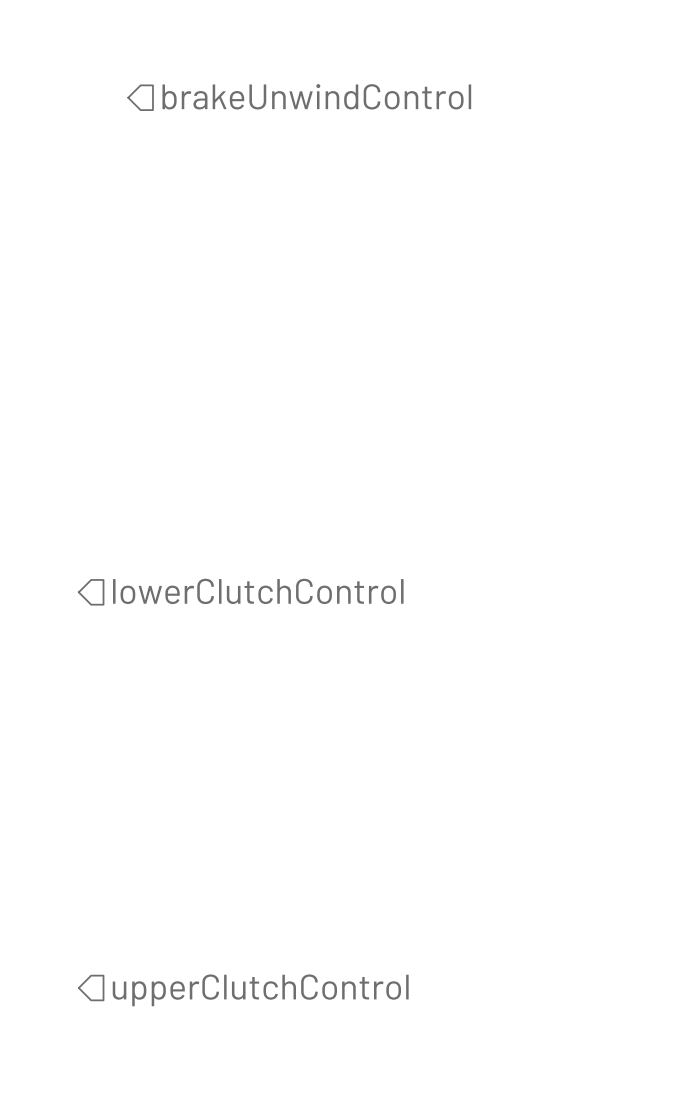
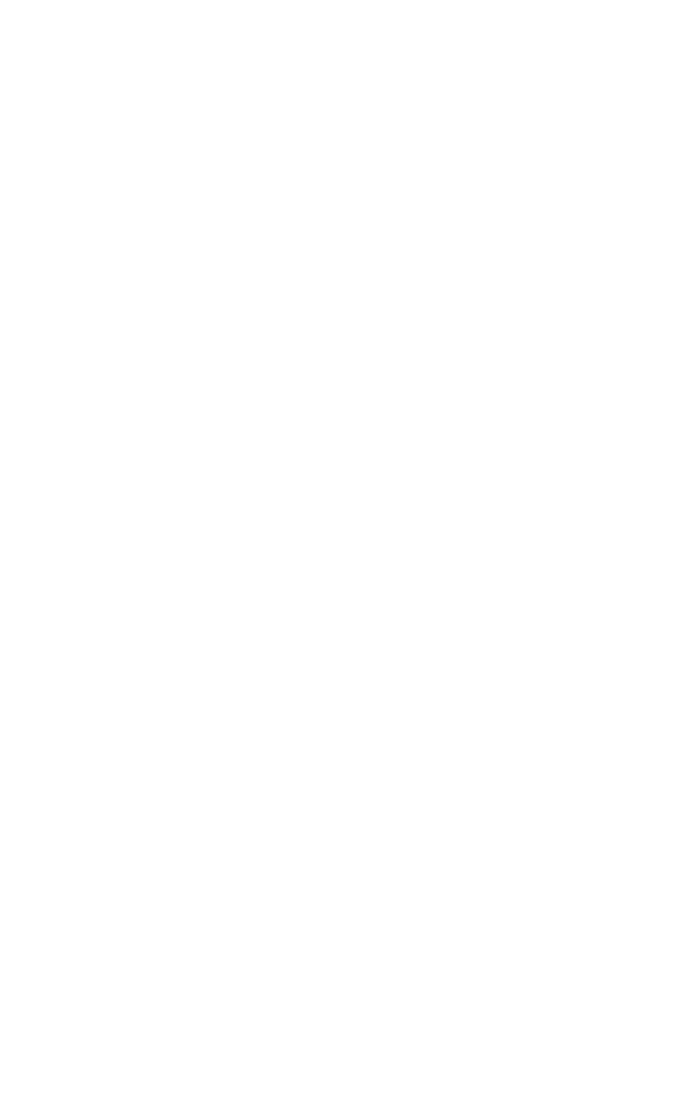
hierarchical label: brakeUnwindControl (316, 96) -> none
hierarchical label: lowerClutchControl (258, 591) -> none
hierarchical label: upperClutchControl (260, 990) -> none

